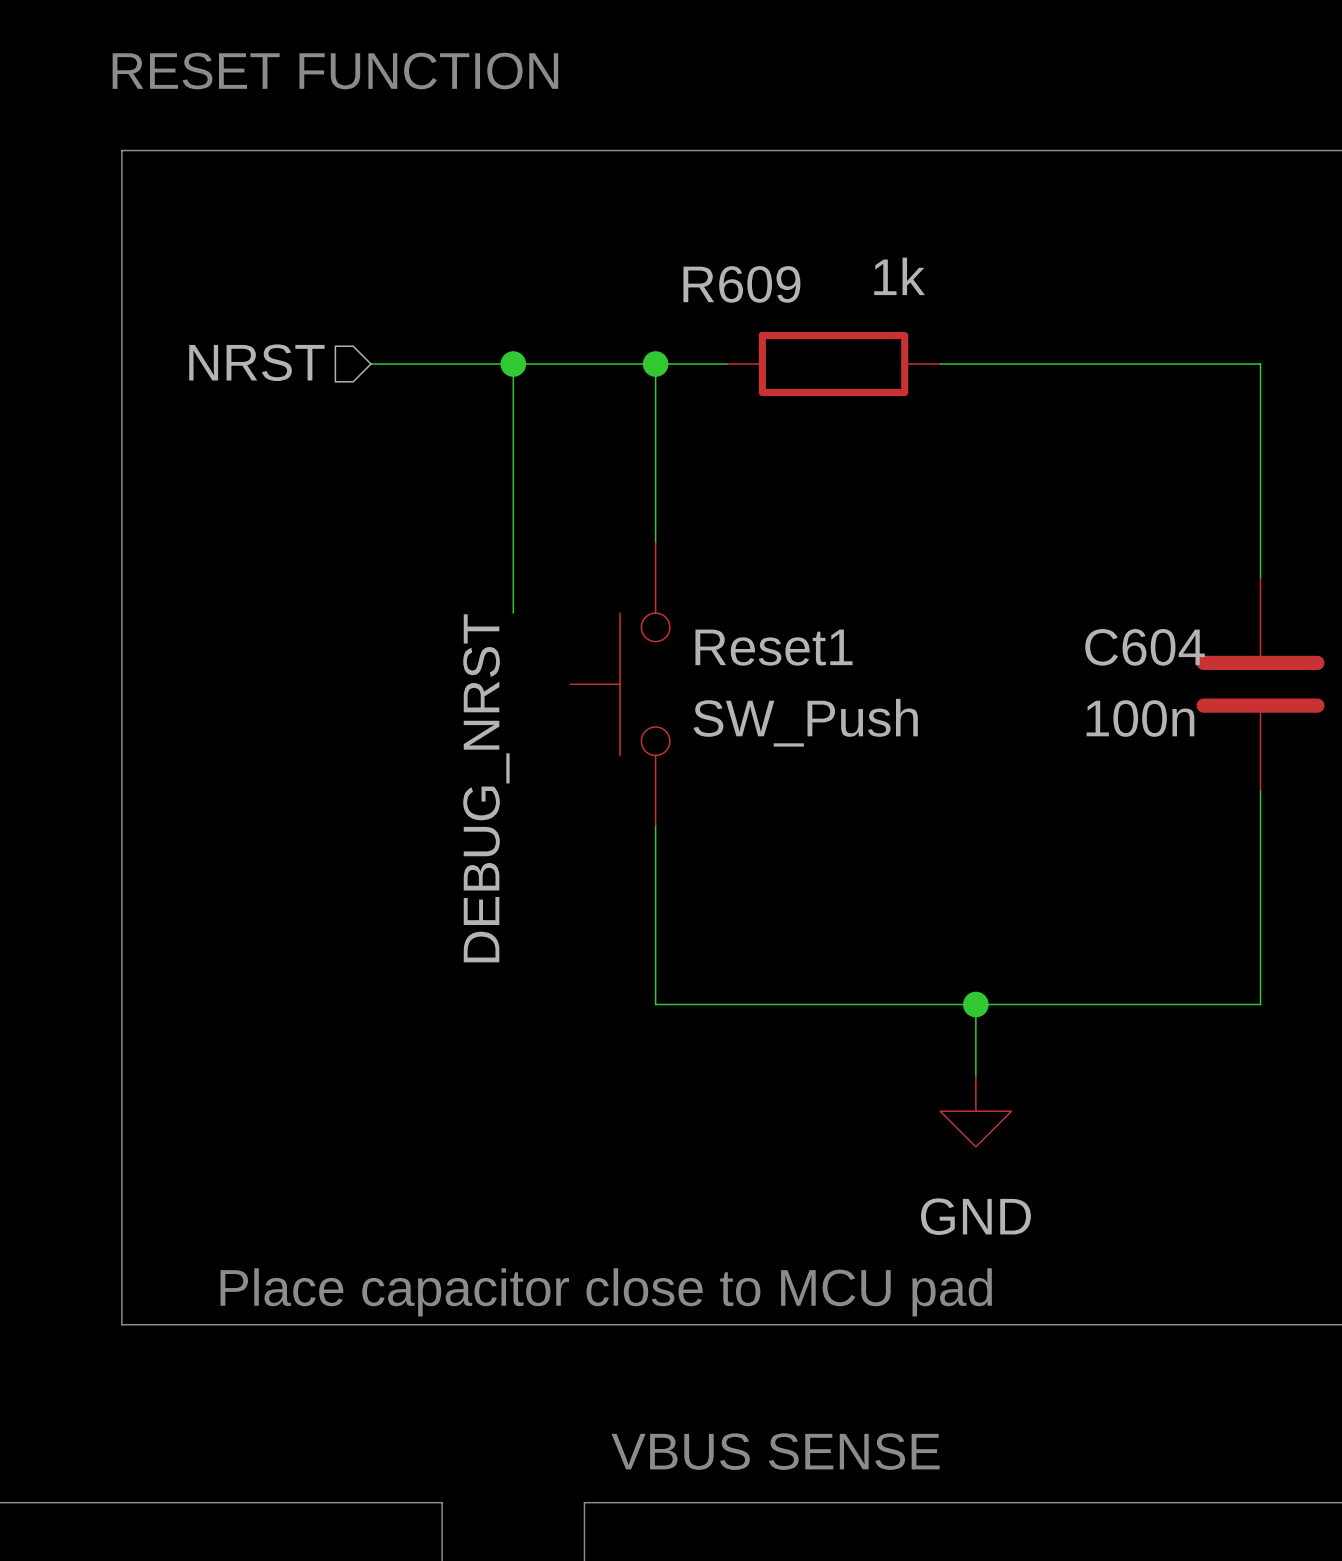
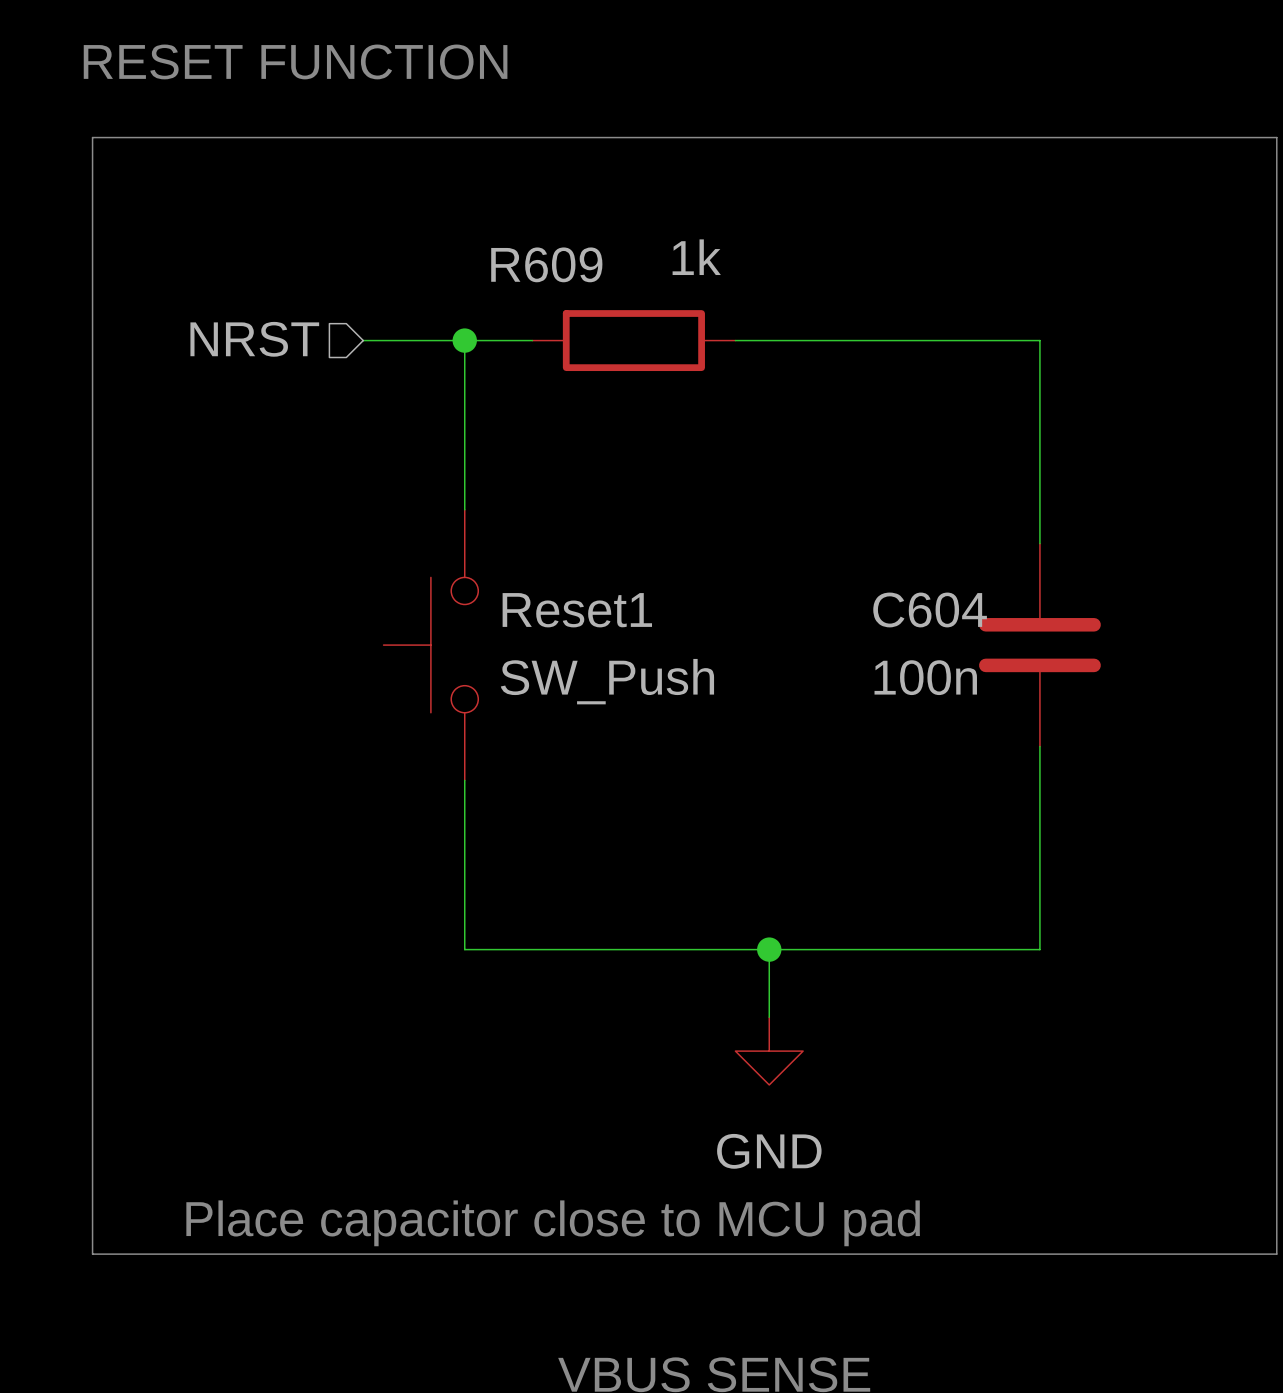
hierarchical label position: NRST (256, 362) -> NRST (254, 339)
wire: (370, 364) (406, 364) -> none
wire: (584, 364) (726, 364) -> (735, 340) (870, 340)
wire: (655, 364) (655, 541) -> none
junction: (655, 364) -> none
R609 position: (833, 364) -> (633, 340)
wire: (1118, 364) (1260, 364) (1260, 577) -> (1039, 340) (1039, 543)
Reset1 position: (620, 684) -> (430, 645)
C604 position: (1260, 684) -> (1039, 645)
label: DEBUG_NRST (486, 788) -> none
wire: (1260, 791) (1260, 1004) (1118, 1004) -> (1039, 746) (1039, 949)
wire: (655, 826) (655, 1004) -> (464, 780) (464, 949) (600, 949)
wire: (975, 1004) (975, 1075) -> (769, 949) (769, 1017)
junction position: (975, 1004) -> (769, 949)
power symbol position: GND (975, 1111) -> GND (769, 1051)

